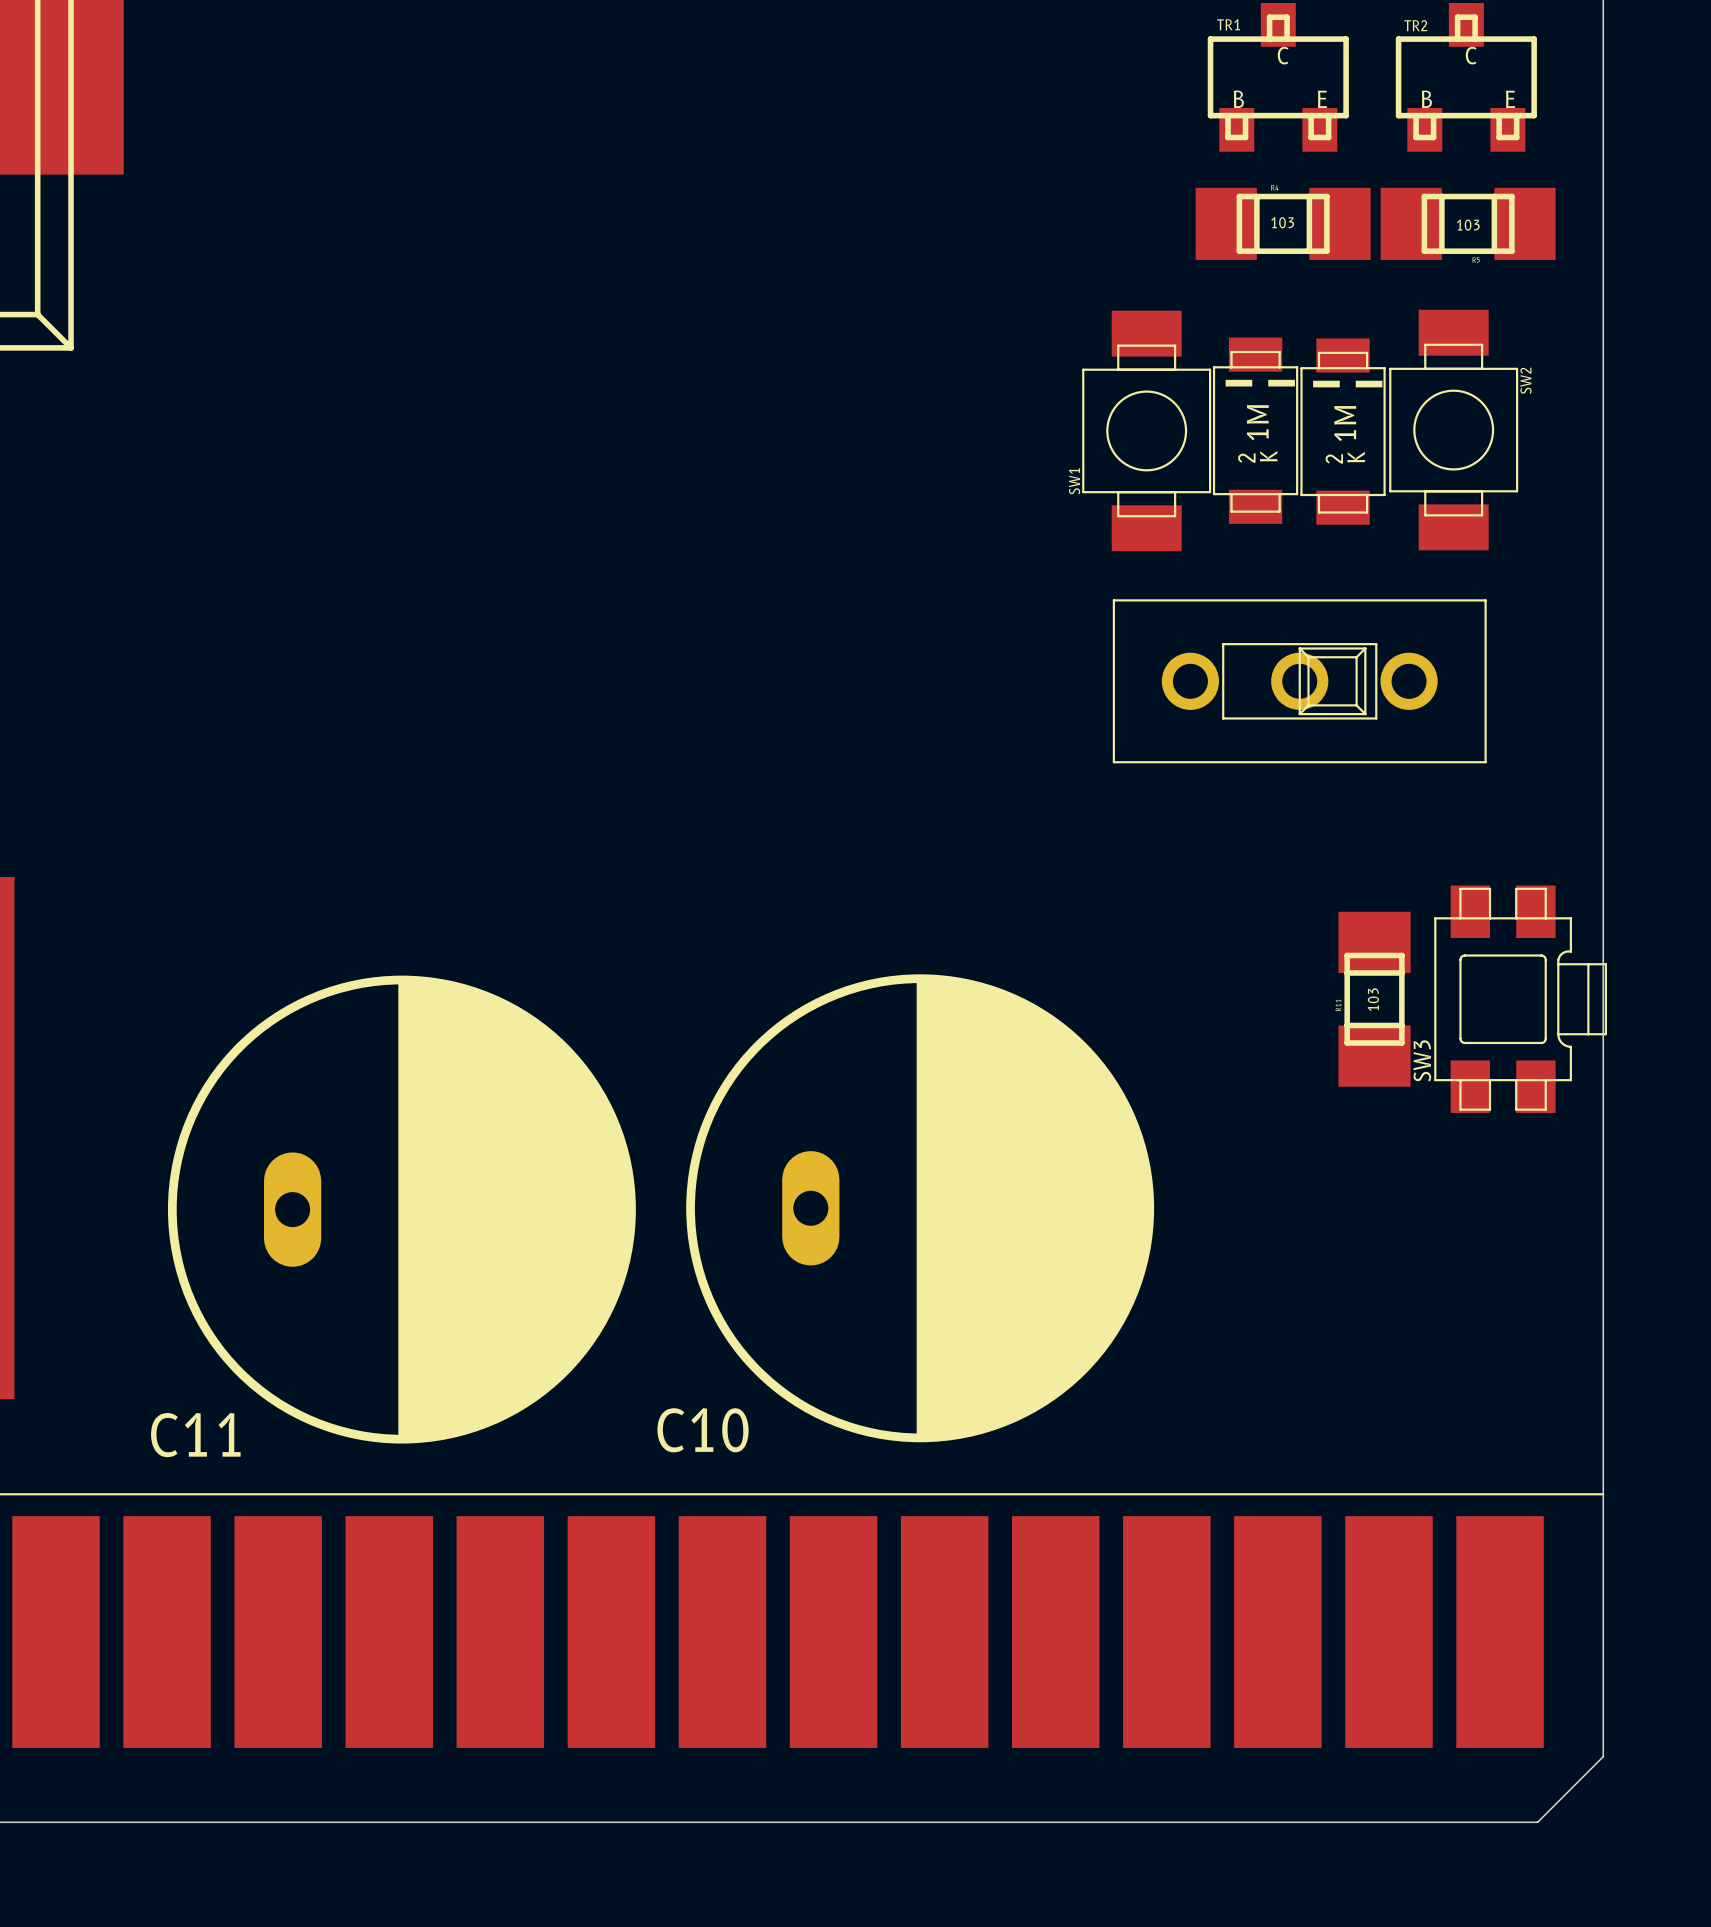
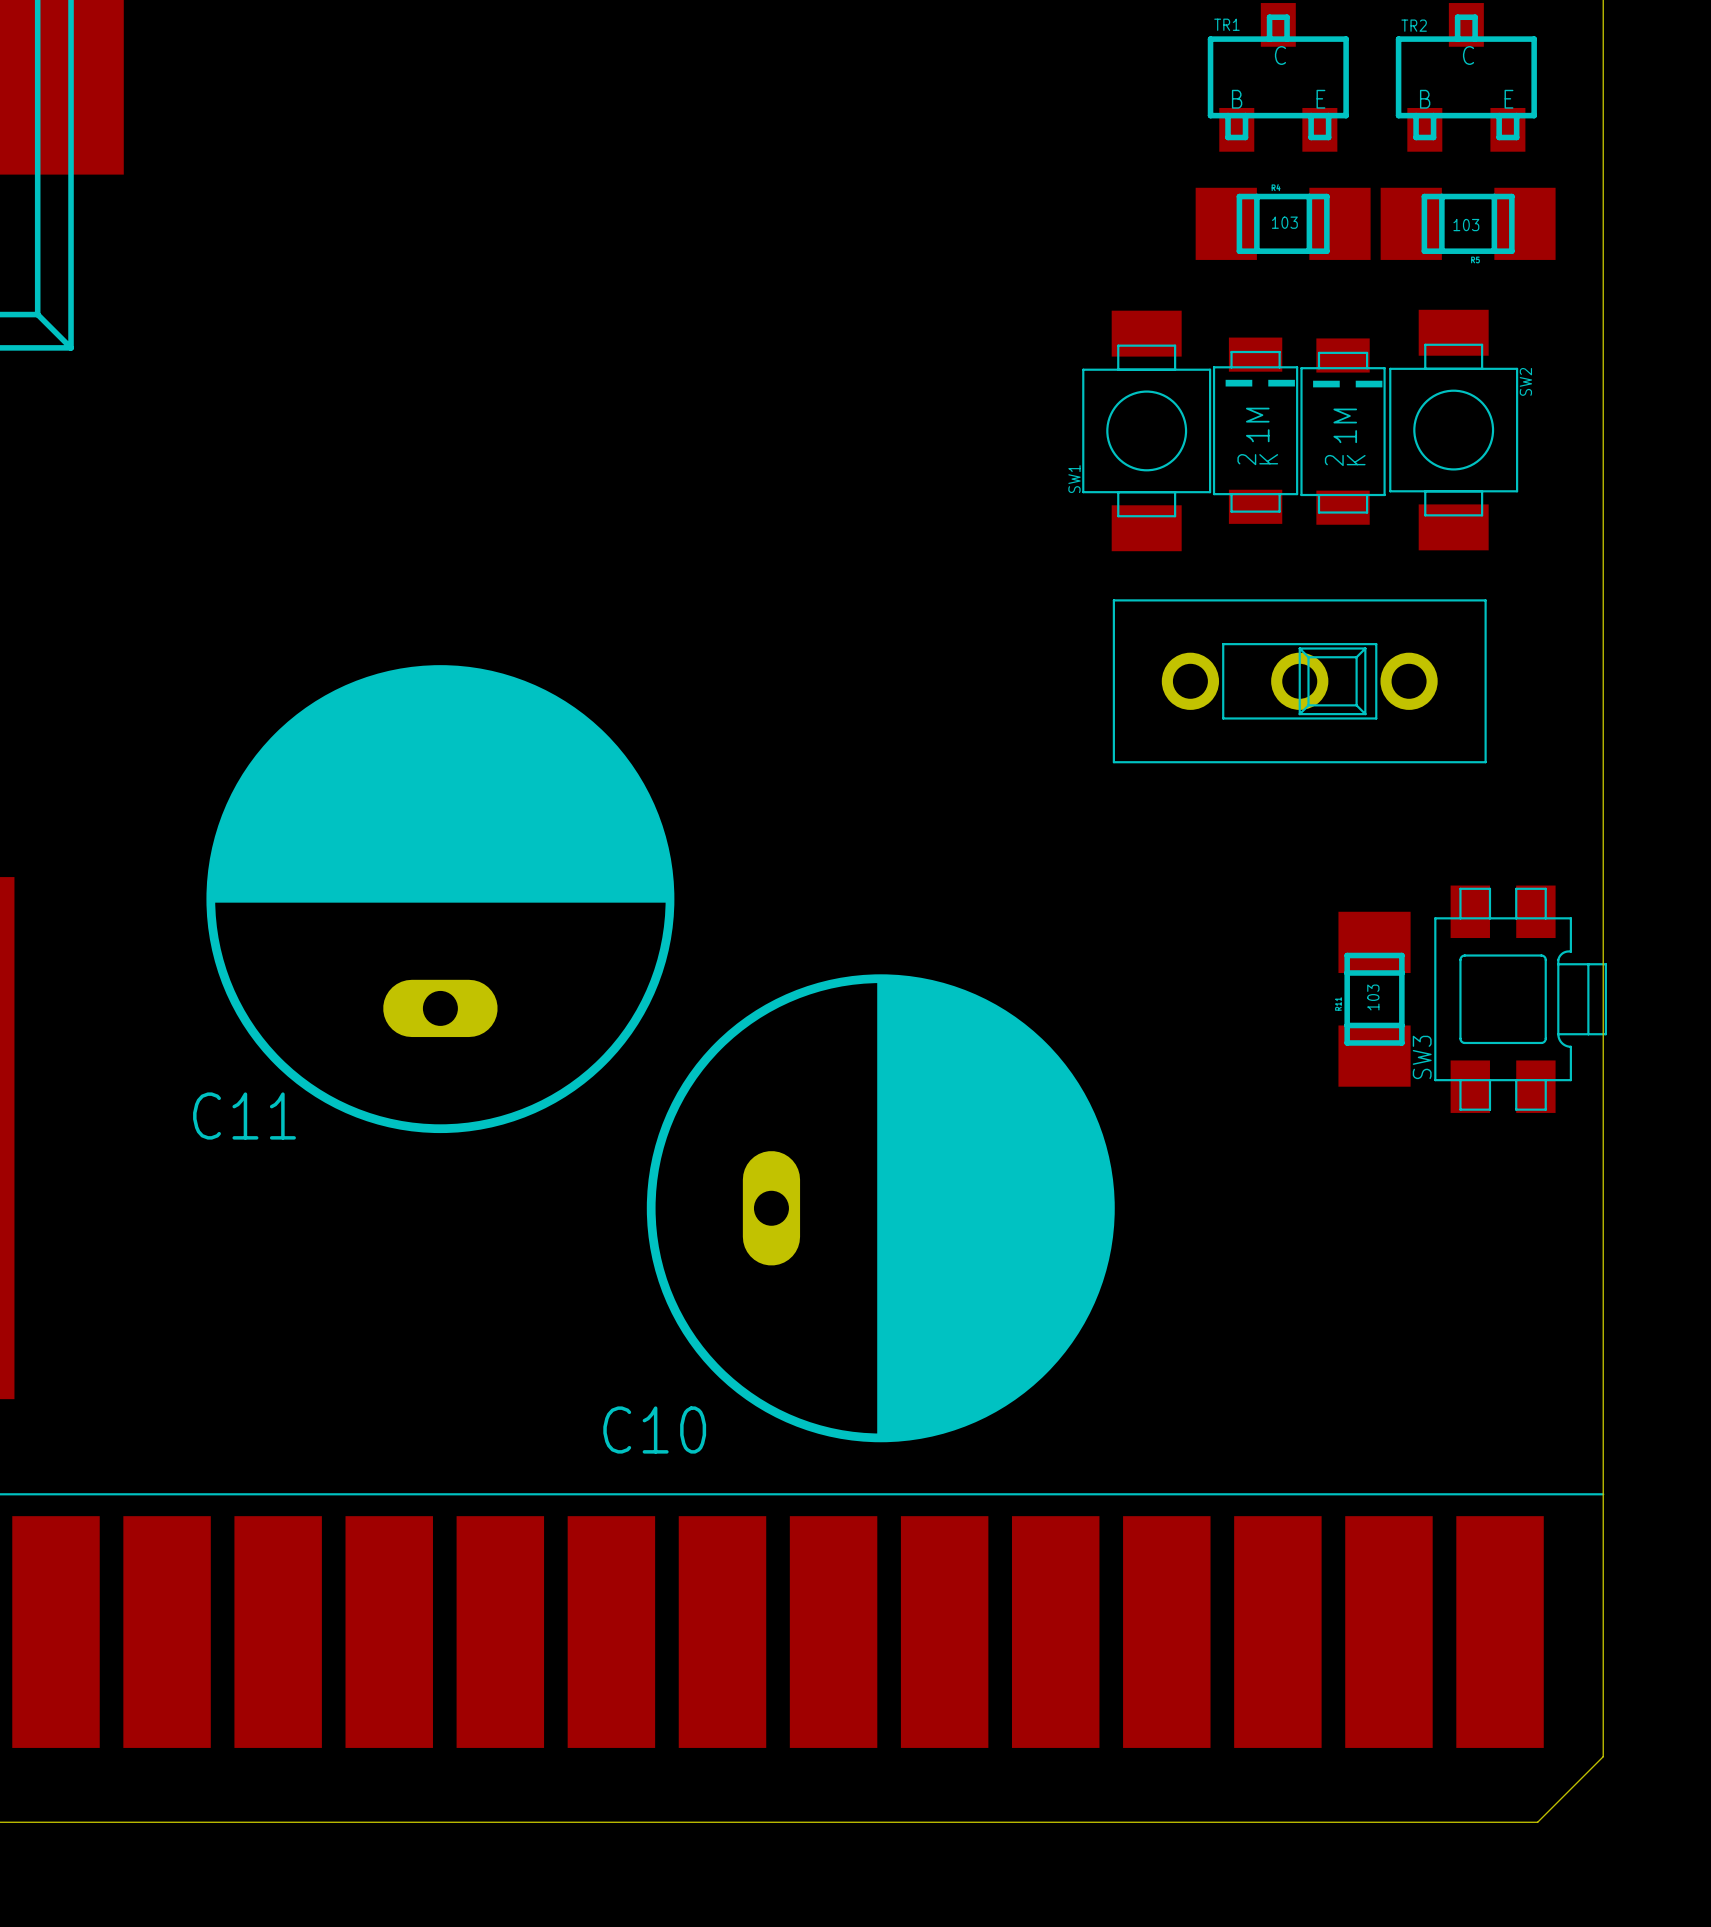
C10 position: (920, 1208) -> (880, 1208)
C11 rotation: 0° (401, 1209) -> 90° counterclockwise (440, 899)
C11 position: (401, 1209) -> (440, 899)

